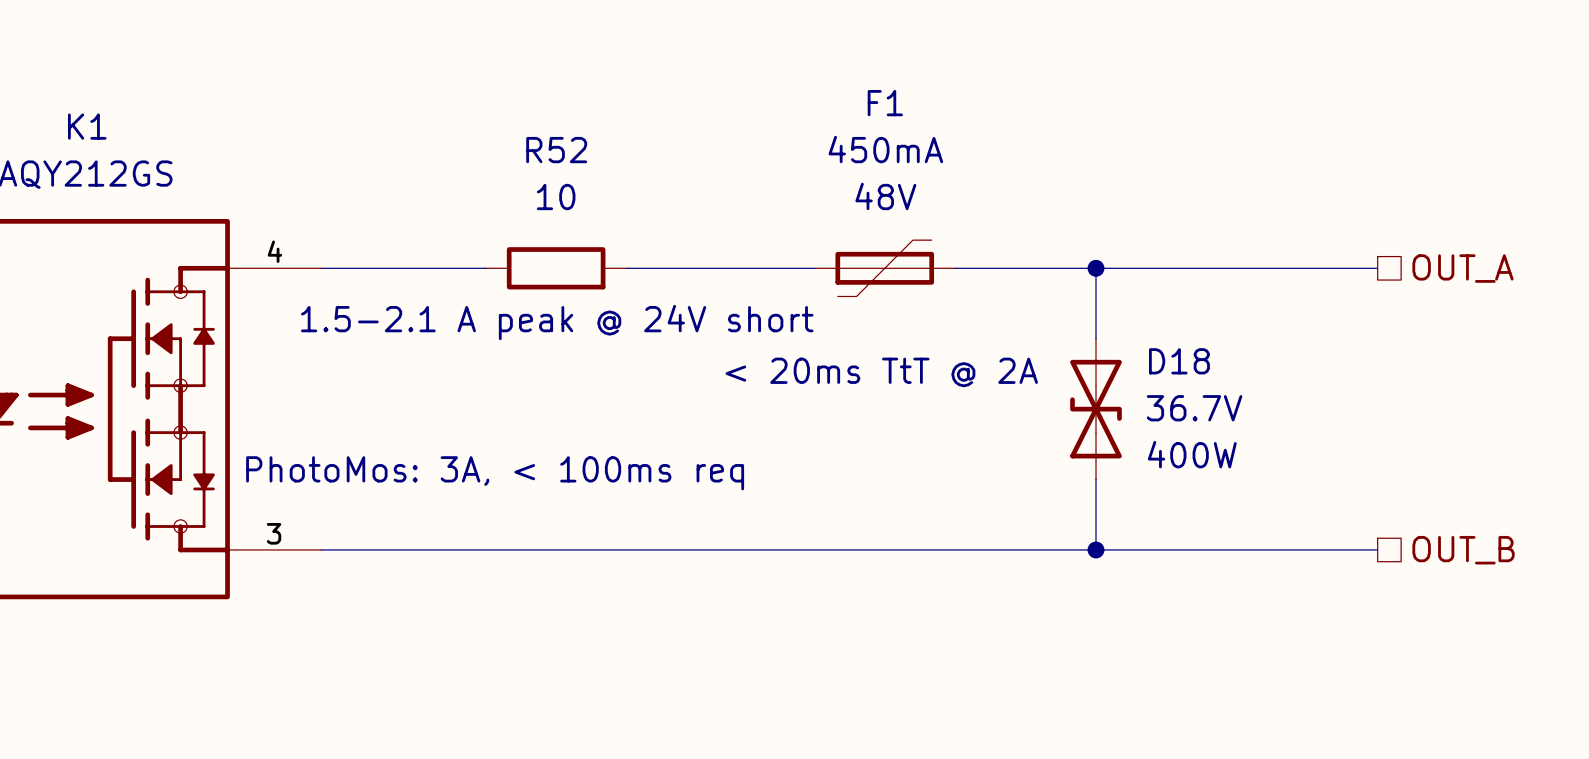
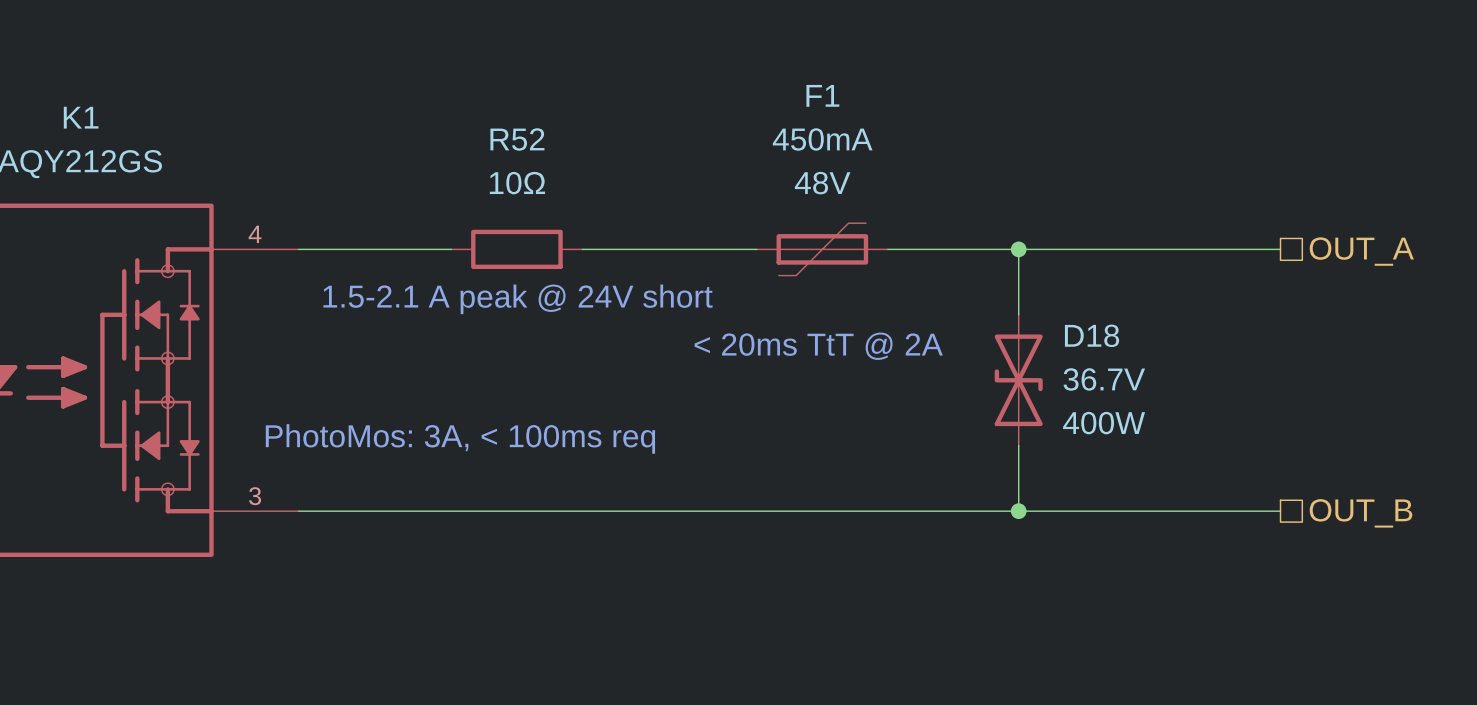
R52 value: 10 (556, 197) -> 10Ω (517, 183)

